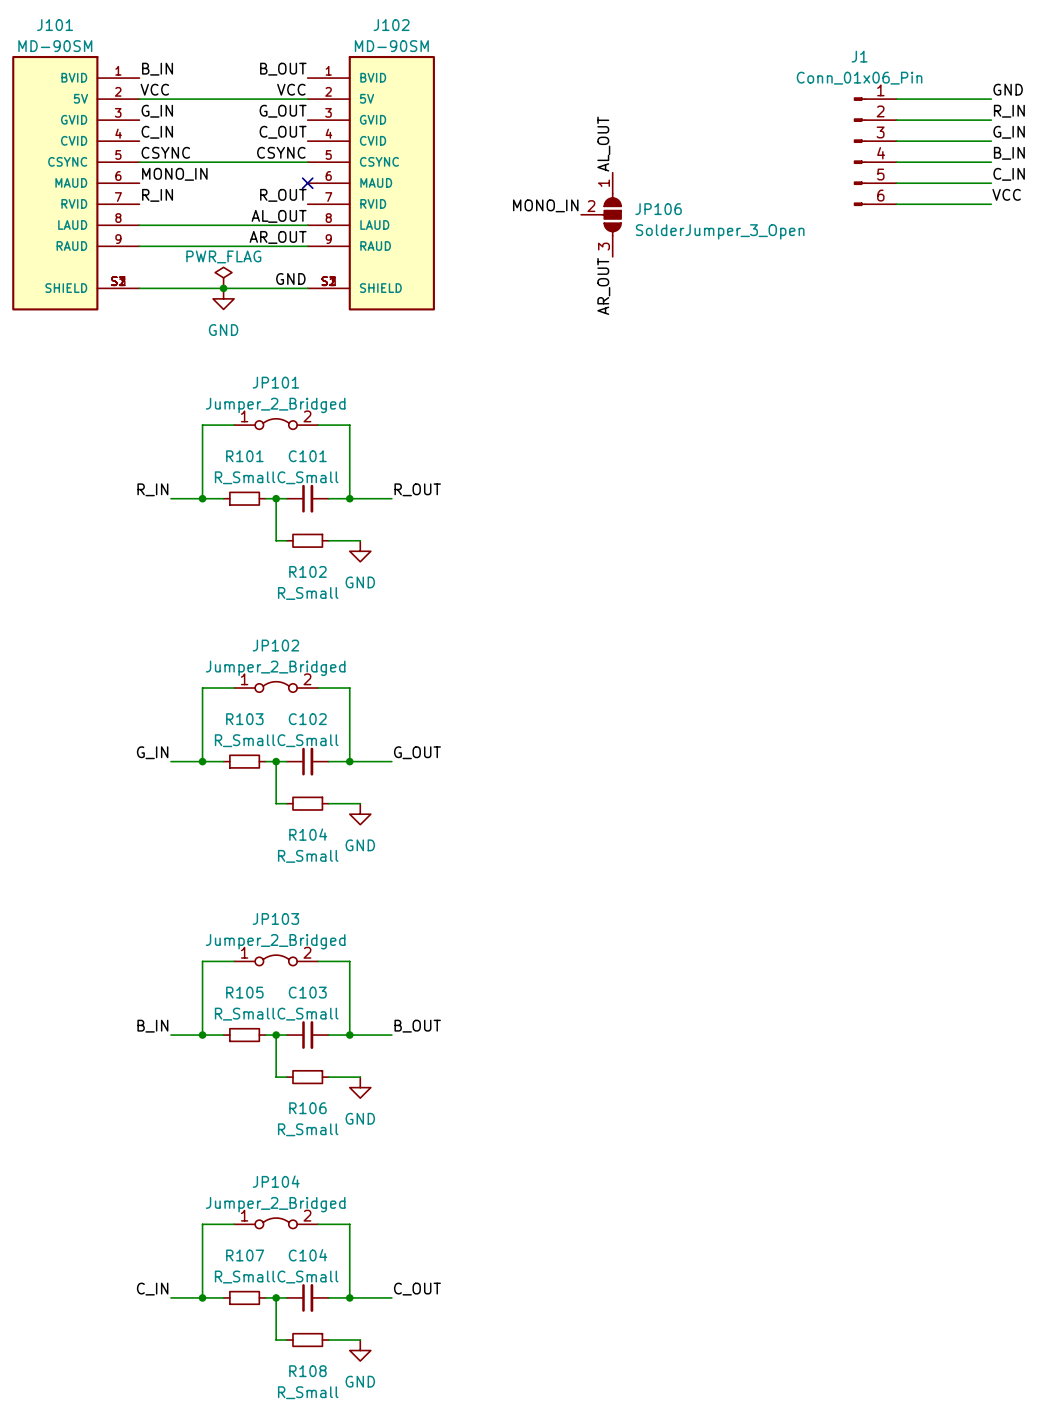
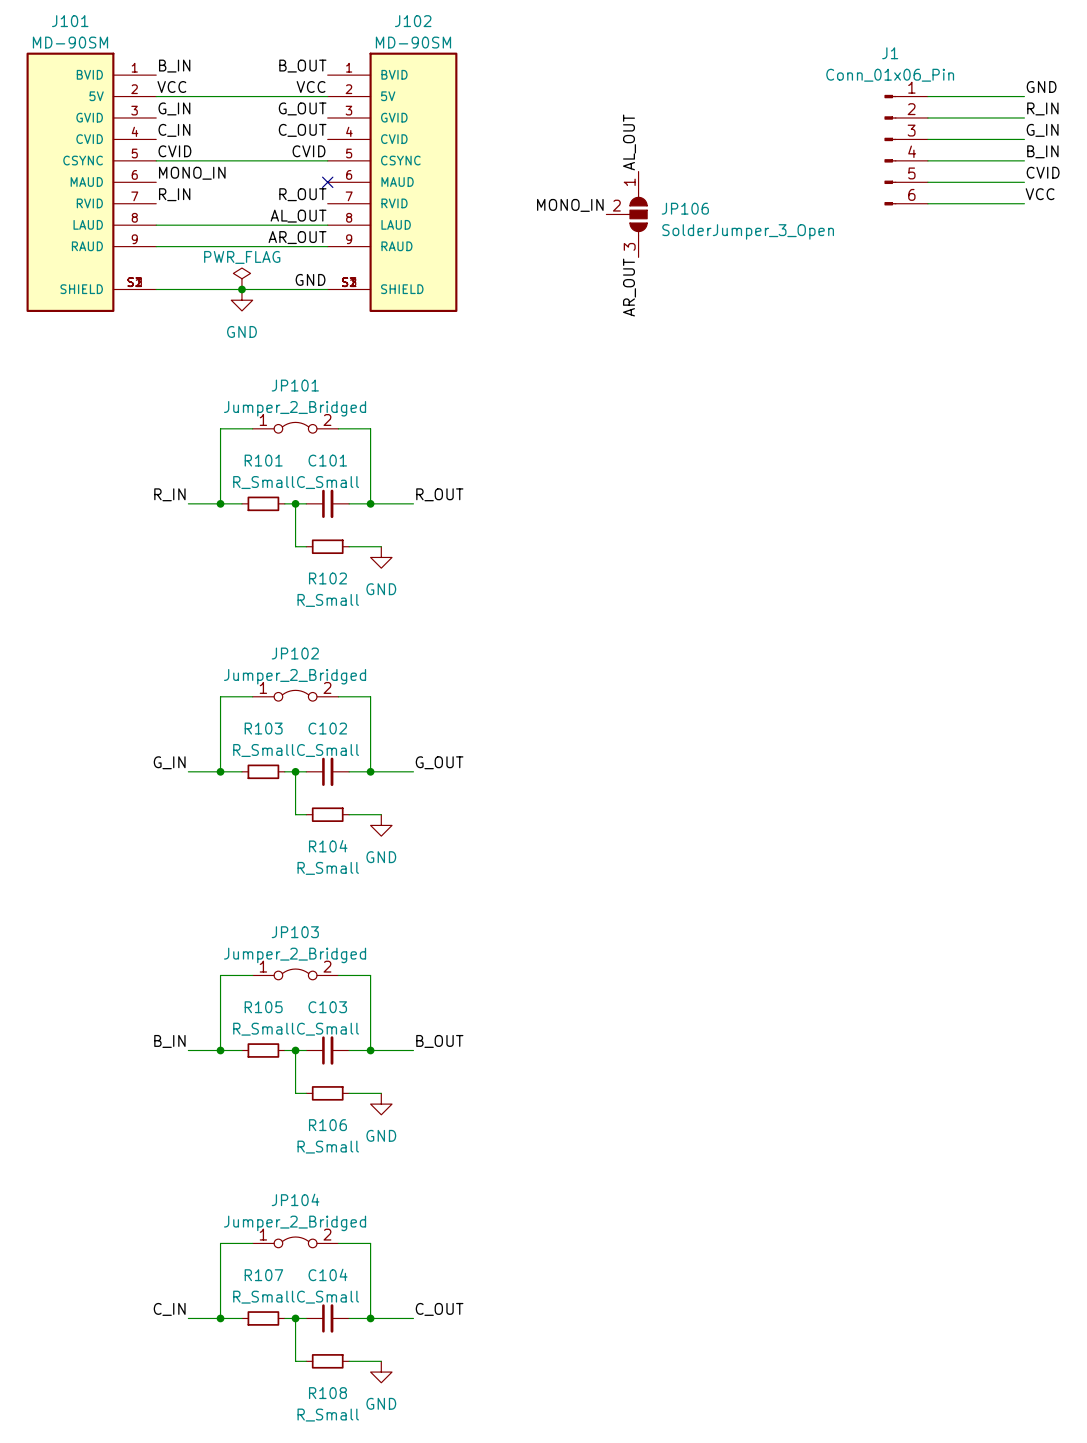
label: CSYNC (165, 152) -> CVID (174, 151)
label: CSYNC (281, 152) -> CVID (309, 151)
label: C_IN (1009, 174) -> CVID (1043, 172)

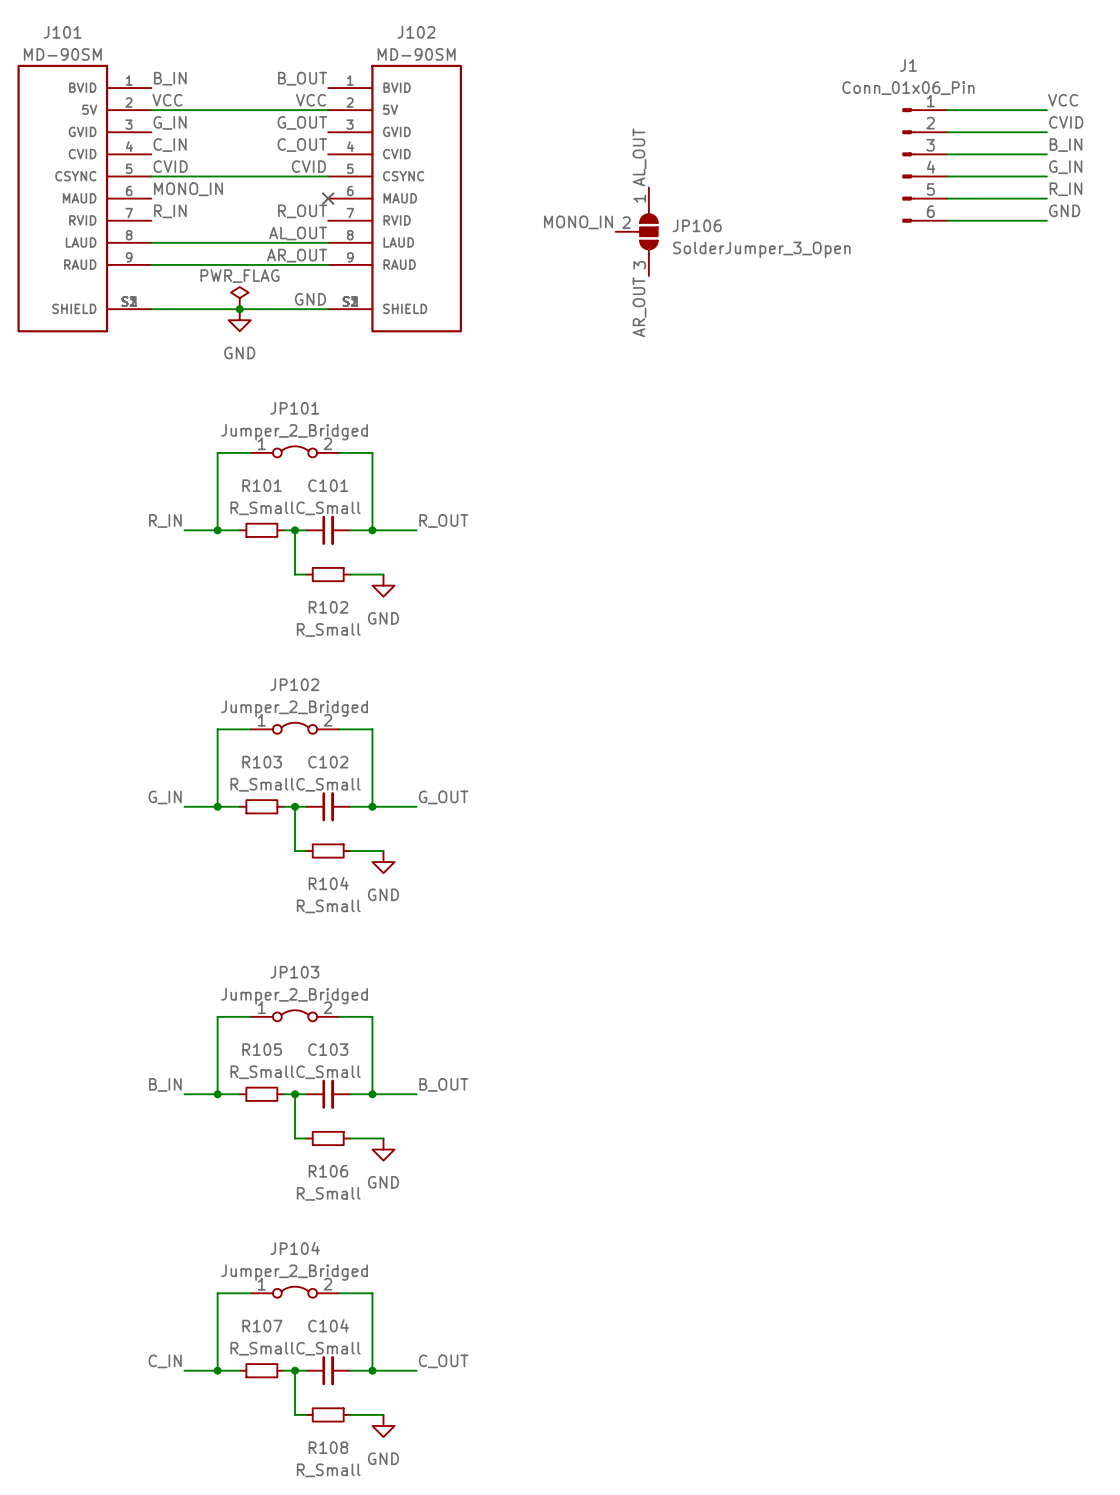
label: GND (1041, 86) -> VCC (1063, 100)
label: R_IN (1042, 108) -> CVID (1066, 122)
label: G_IN (1042, 130) -> B_IN (1065, 145)
label: B_IN (1042, 151) -> G_IN (1065, 167)
label: CVID (1043, 172) -> R_IN (1065, 189)
label: VCC (1040, 194) -> GND (1064, 210)

